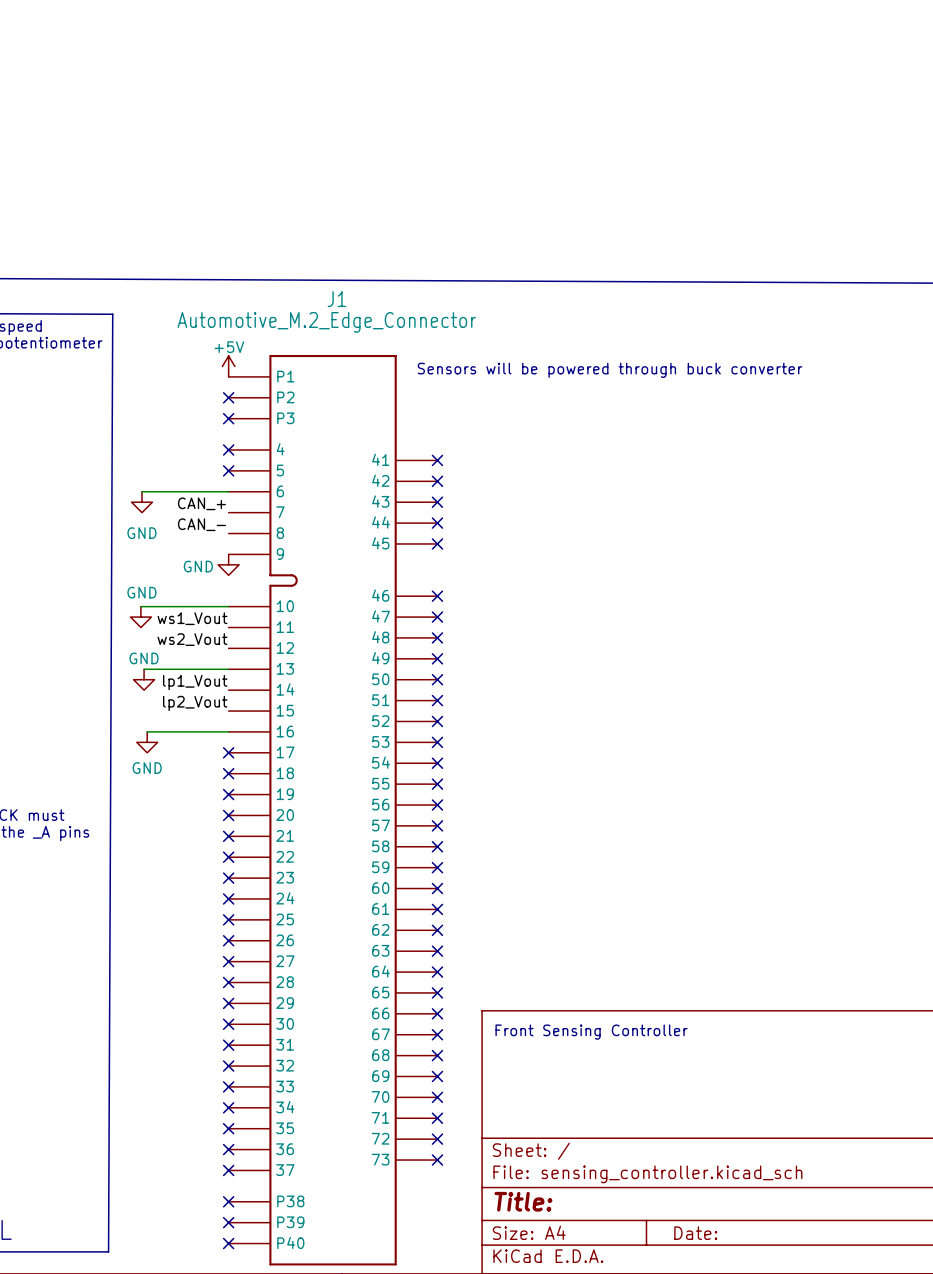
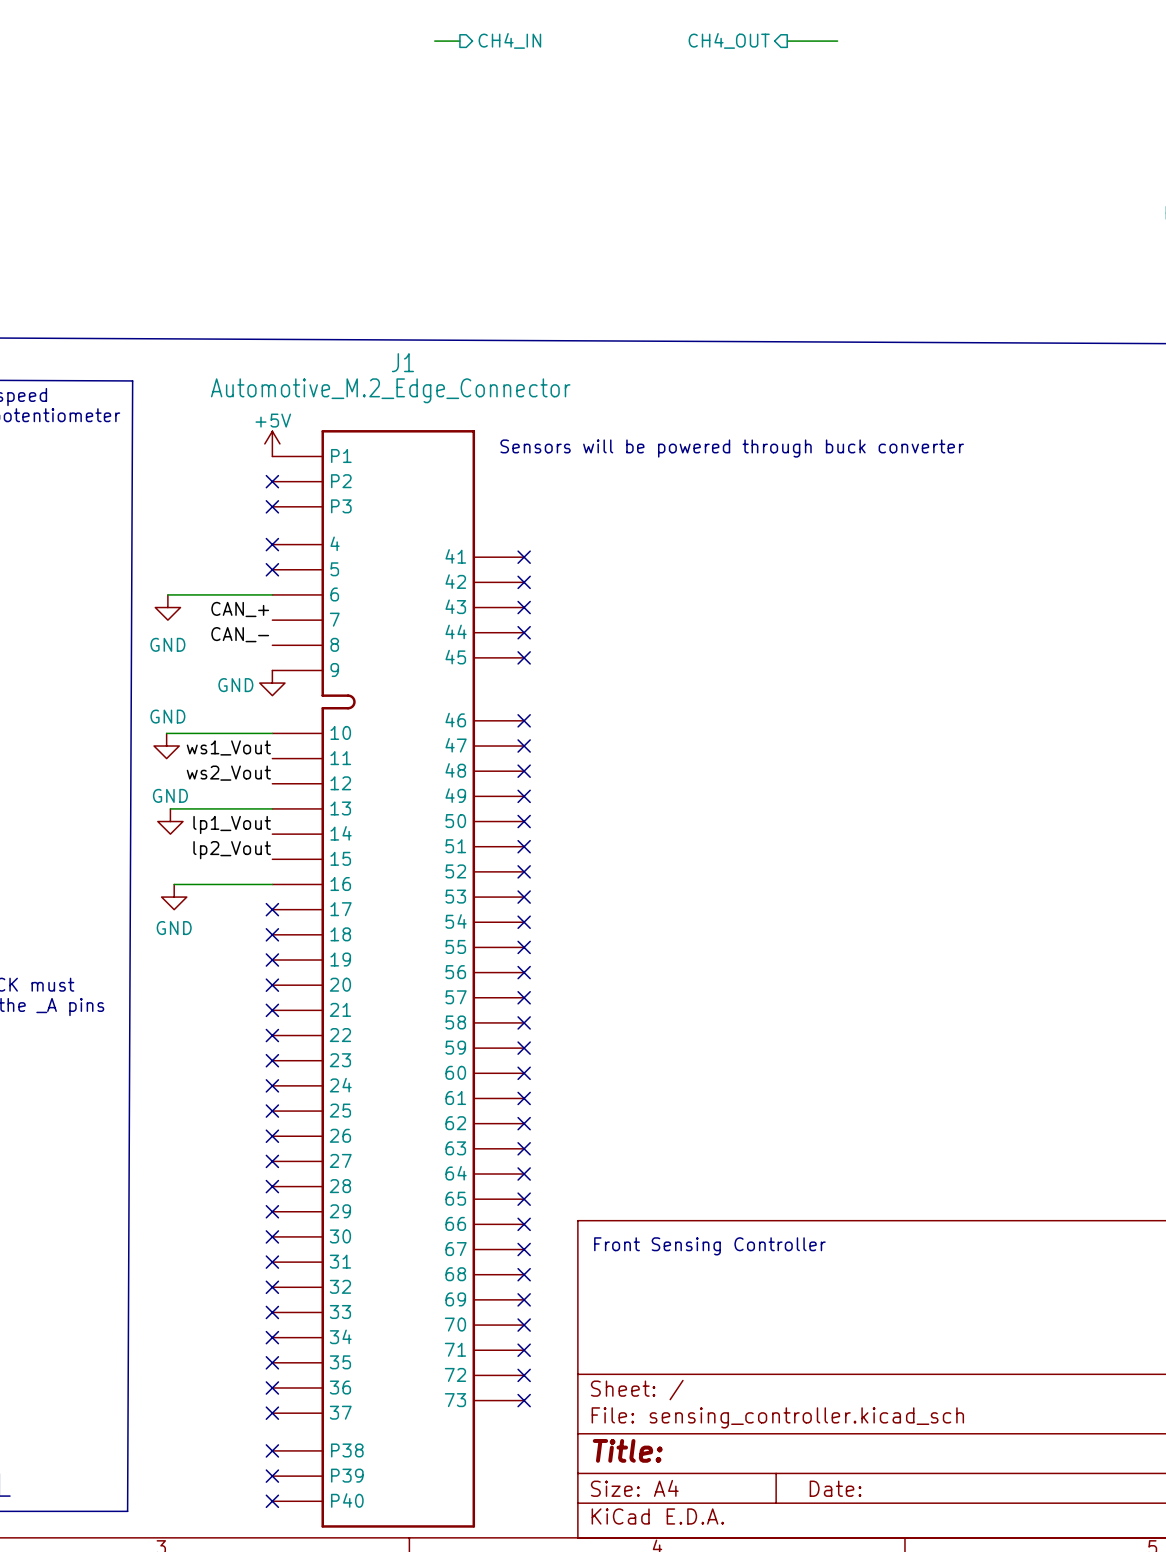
wire: none -> (434, 41) (459, 41)
sheet pin: none -> CH4_IN (509, 40)
sheet pin: none -> CH4_OUT (729, 40)
wire: none -> (787, 41) (837, 41)

